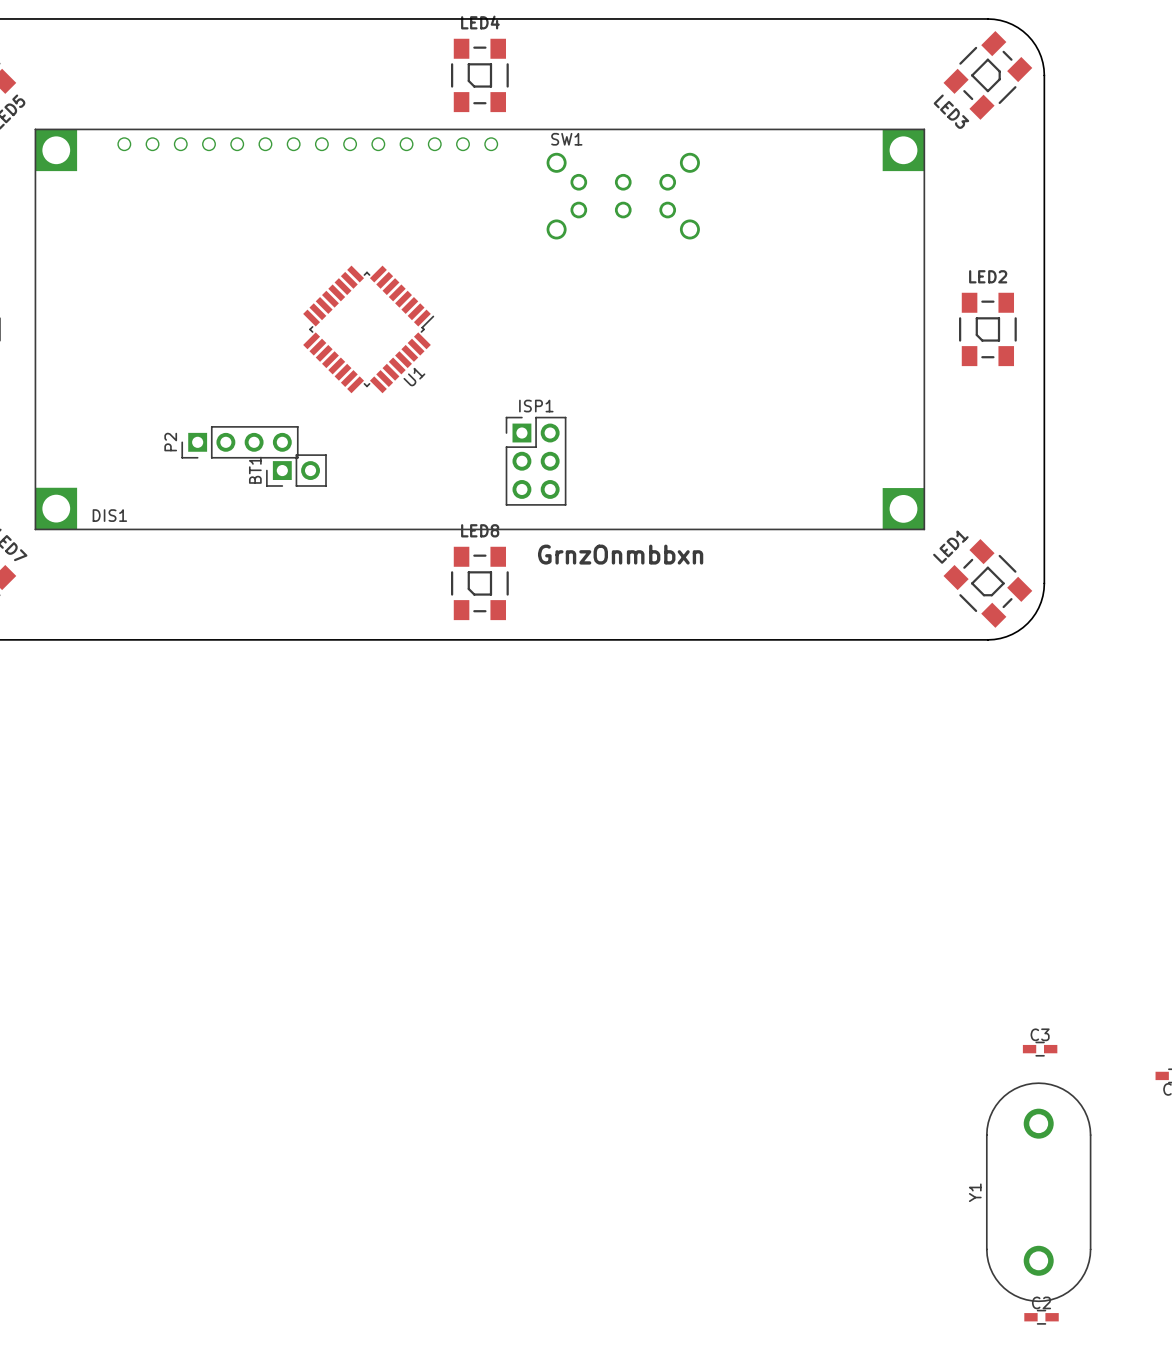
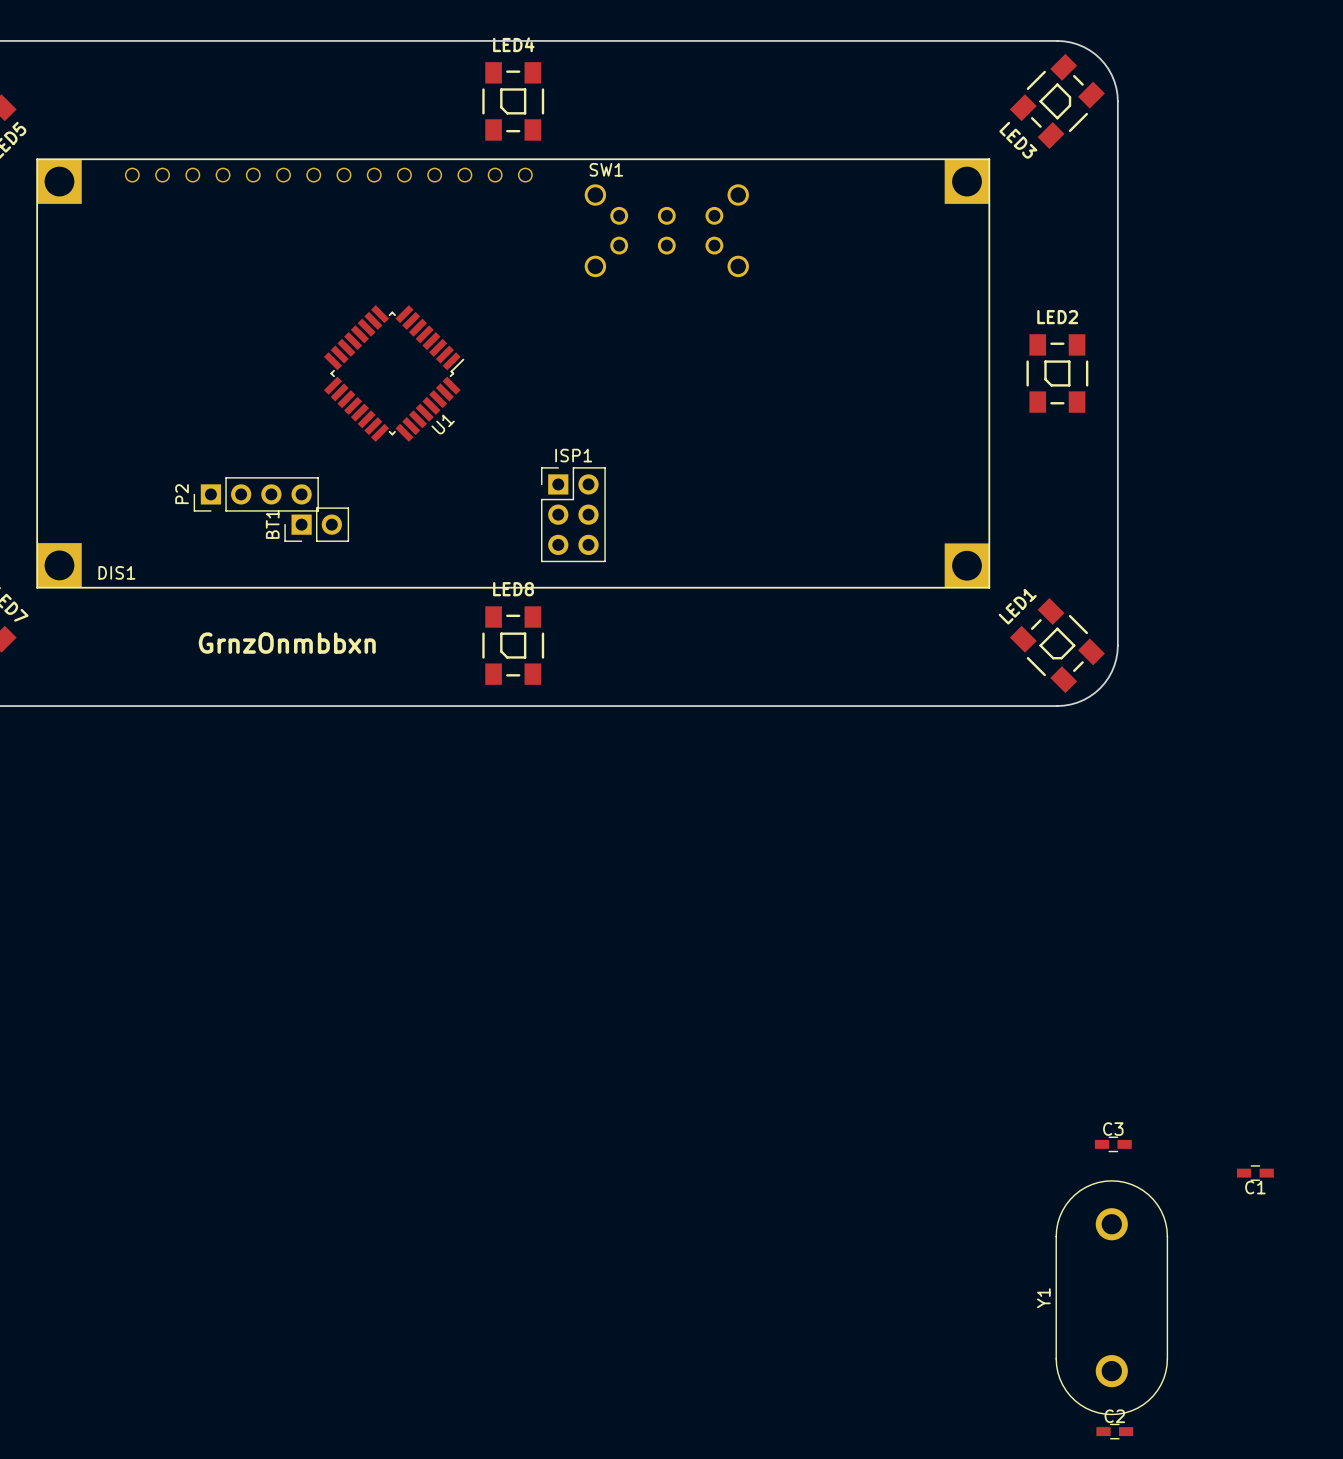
text: GrnzOnmbbxn (620, 554) -> none
text: none -> GrnzOnmbbxn (287, 643)

